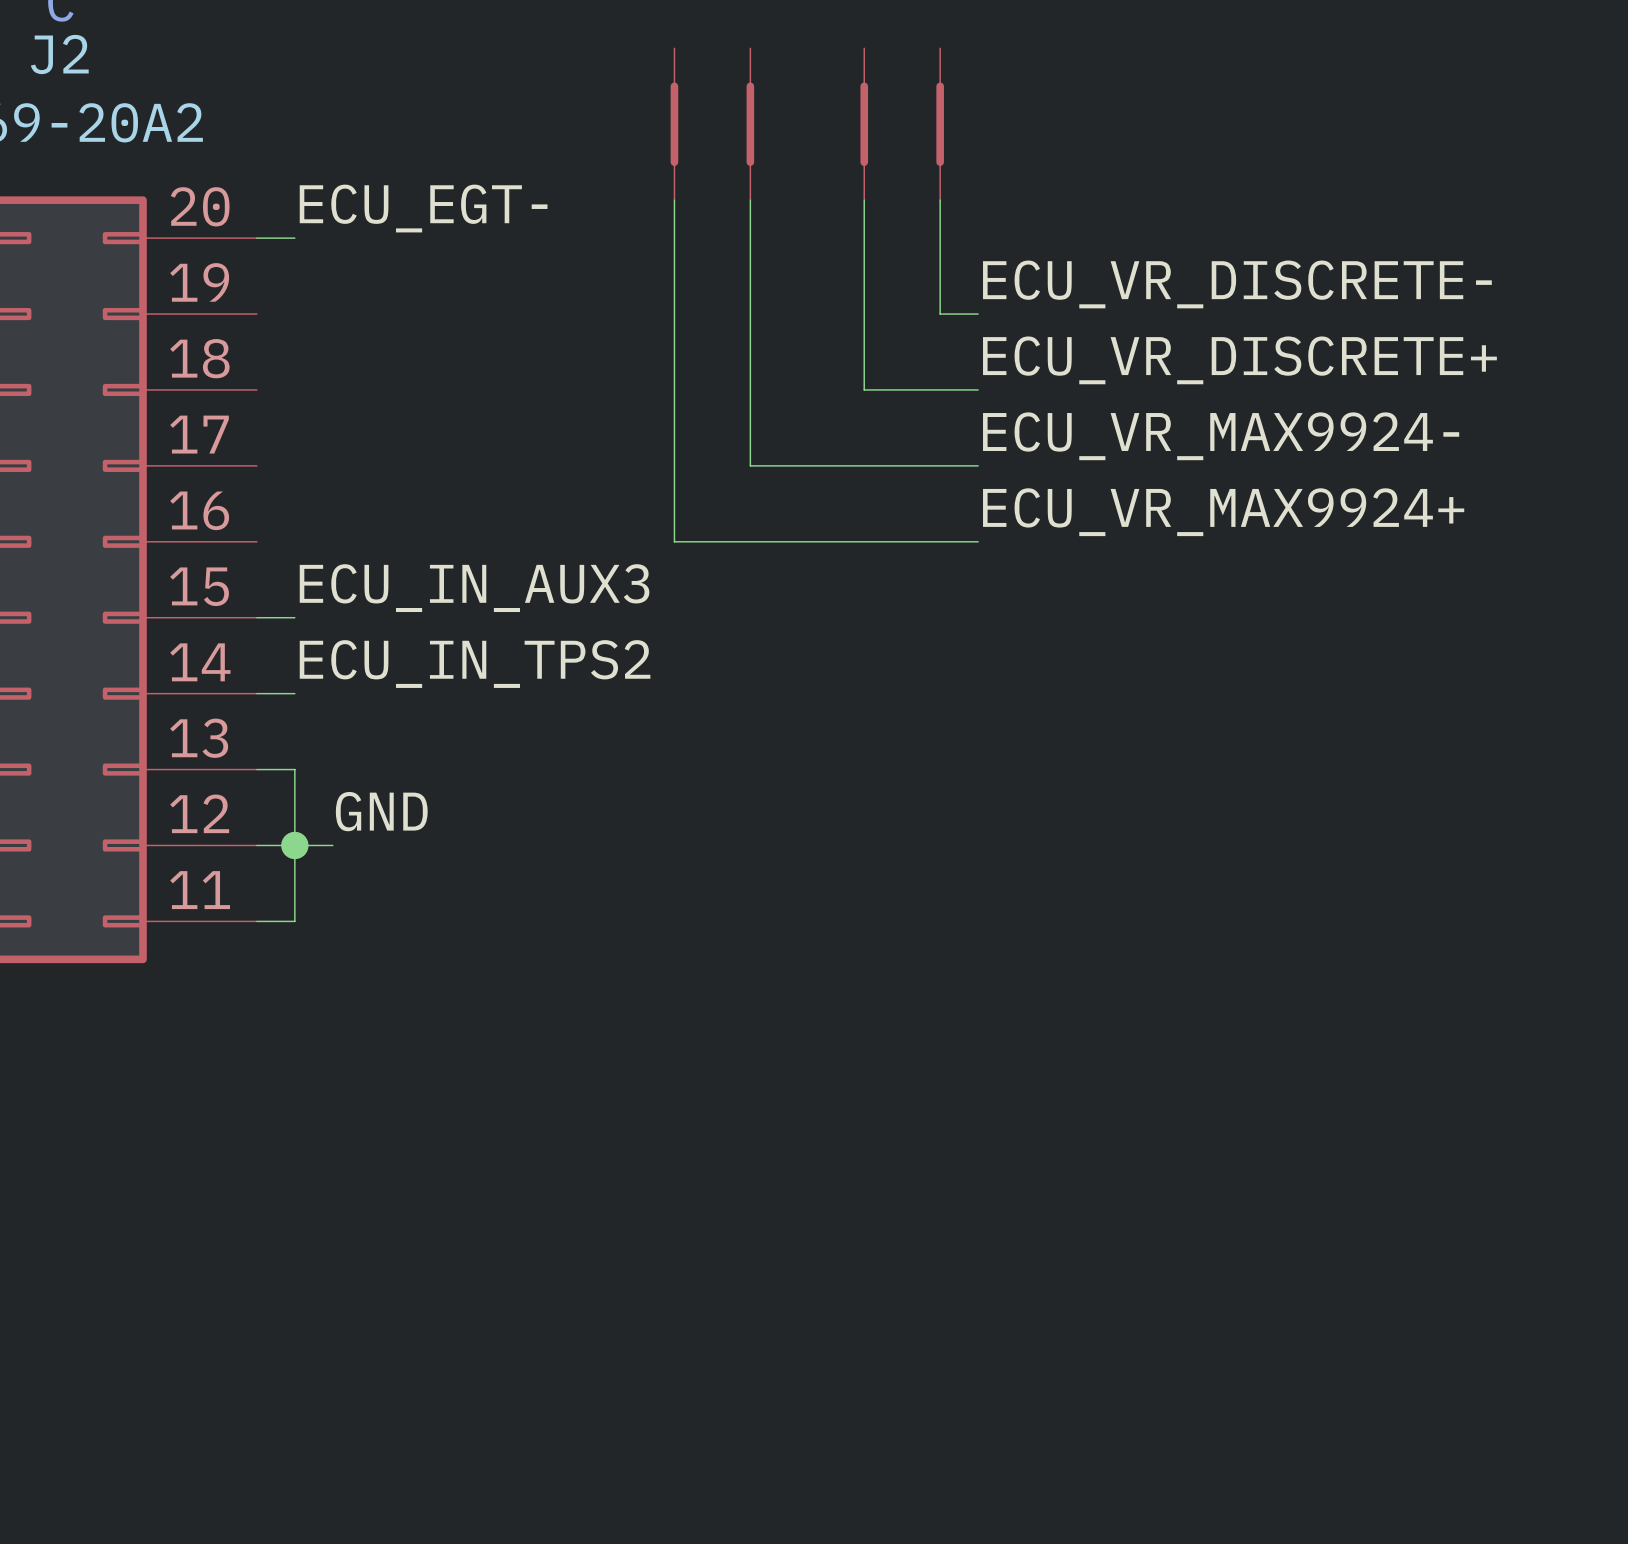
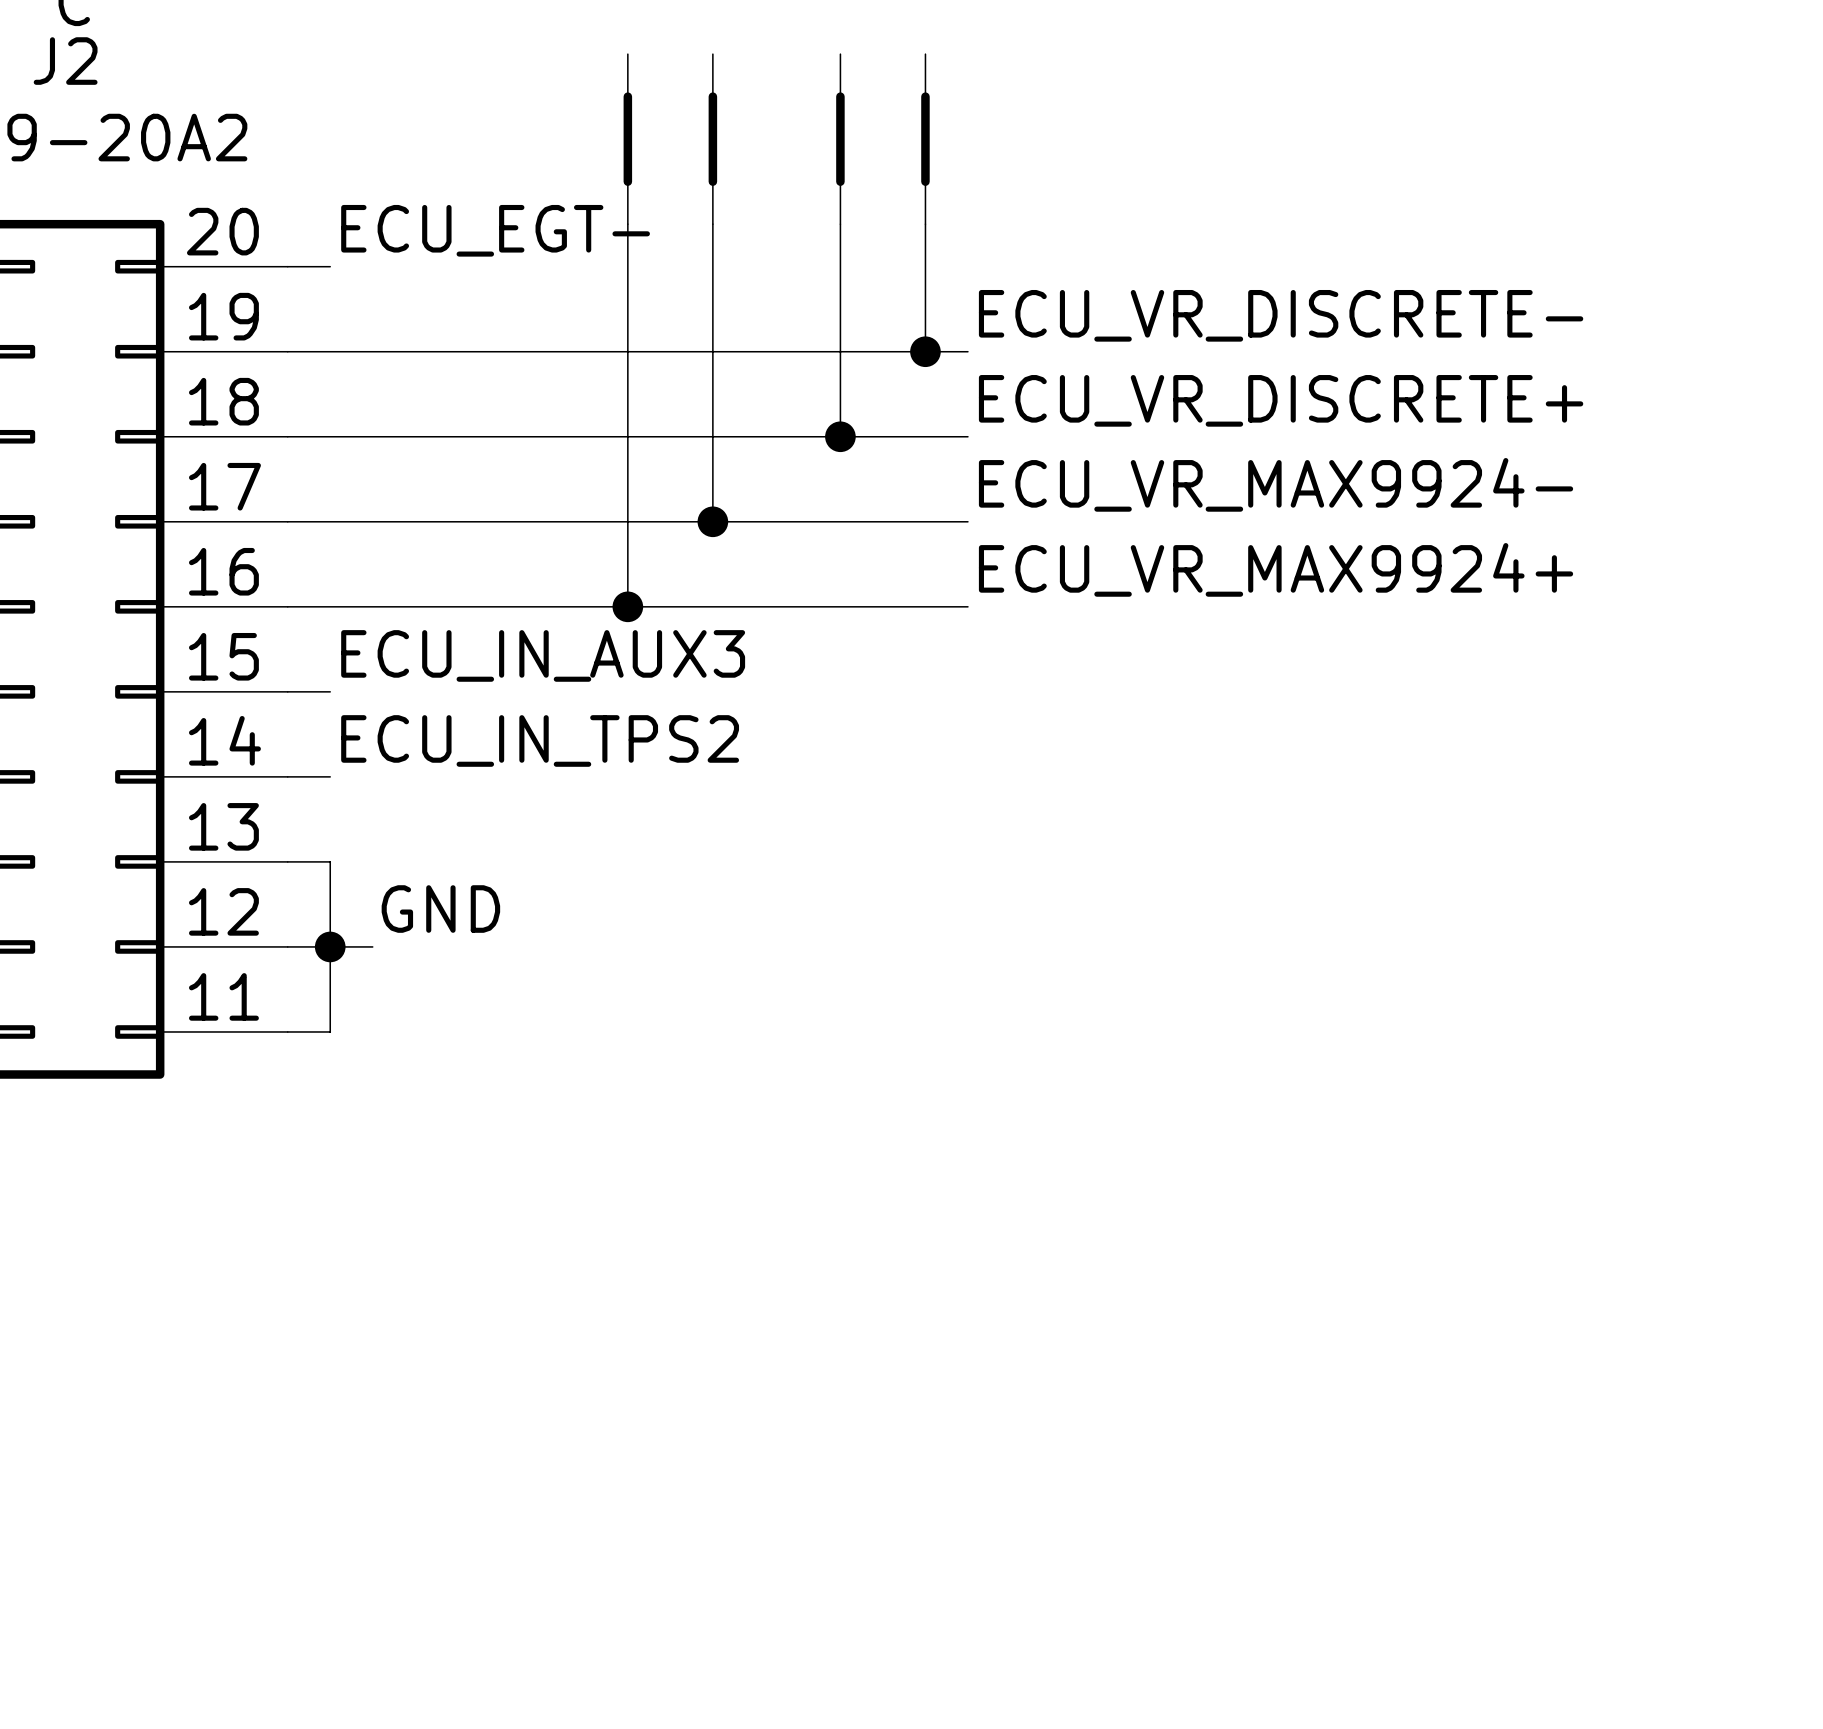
part: none -> (627, 139)
part position: (674, 124) -> (712, 139)
part position: (864, 124) -> (925, 139)
part: (940, 124) -> none
wire: none -> (627, 224) (627, 606)
wire: none -> (712, 224) (712, 521)
wire: (674, 200) (674, 541) -> (287, 606) (755, 606)
wire: none -> (925, 224) (925, 351)
wire: (864, 200) (864, 389) (978, 389) -> none
wire: (940, 200) (940, 314) (978, 314) -> none
label position: ECU_VR_DISCRETE- (1237, 284) -> ECU_VR_DISCRETE- (1281, 315)
wire: none -> (287, 351) (967, 351)
junction: none -> (925, 351)
label position: ECU_VR_DISCRETE+ (1239, 360) -> ECU_VR_DISCRETE+ (1281, 400)
wire: none -> (287, 436) (967, 436)
wire: (750, 389) (750, 465) -> (287, 521) (840, 521)
junction: none -> (840, 436)
label position: ECU_VR_MAX9924- (1221, 436) -> ECU_VR_MAX9924- (1276, 484)
junction: none -> (712, 521)
wire: (864, 465) (978, 465) -> none
label position: ECU_VR_MAX9924+ (1223, 512) -> ECU_VR_MAX9924+ (1276, 569)
junction: none -> (627, 606)
wire: (864, 541) (978, 541) -> none

